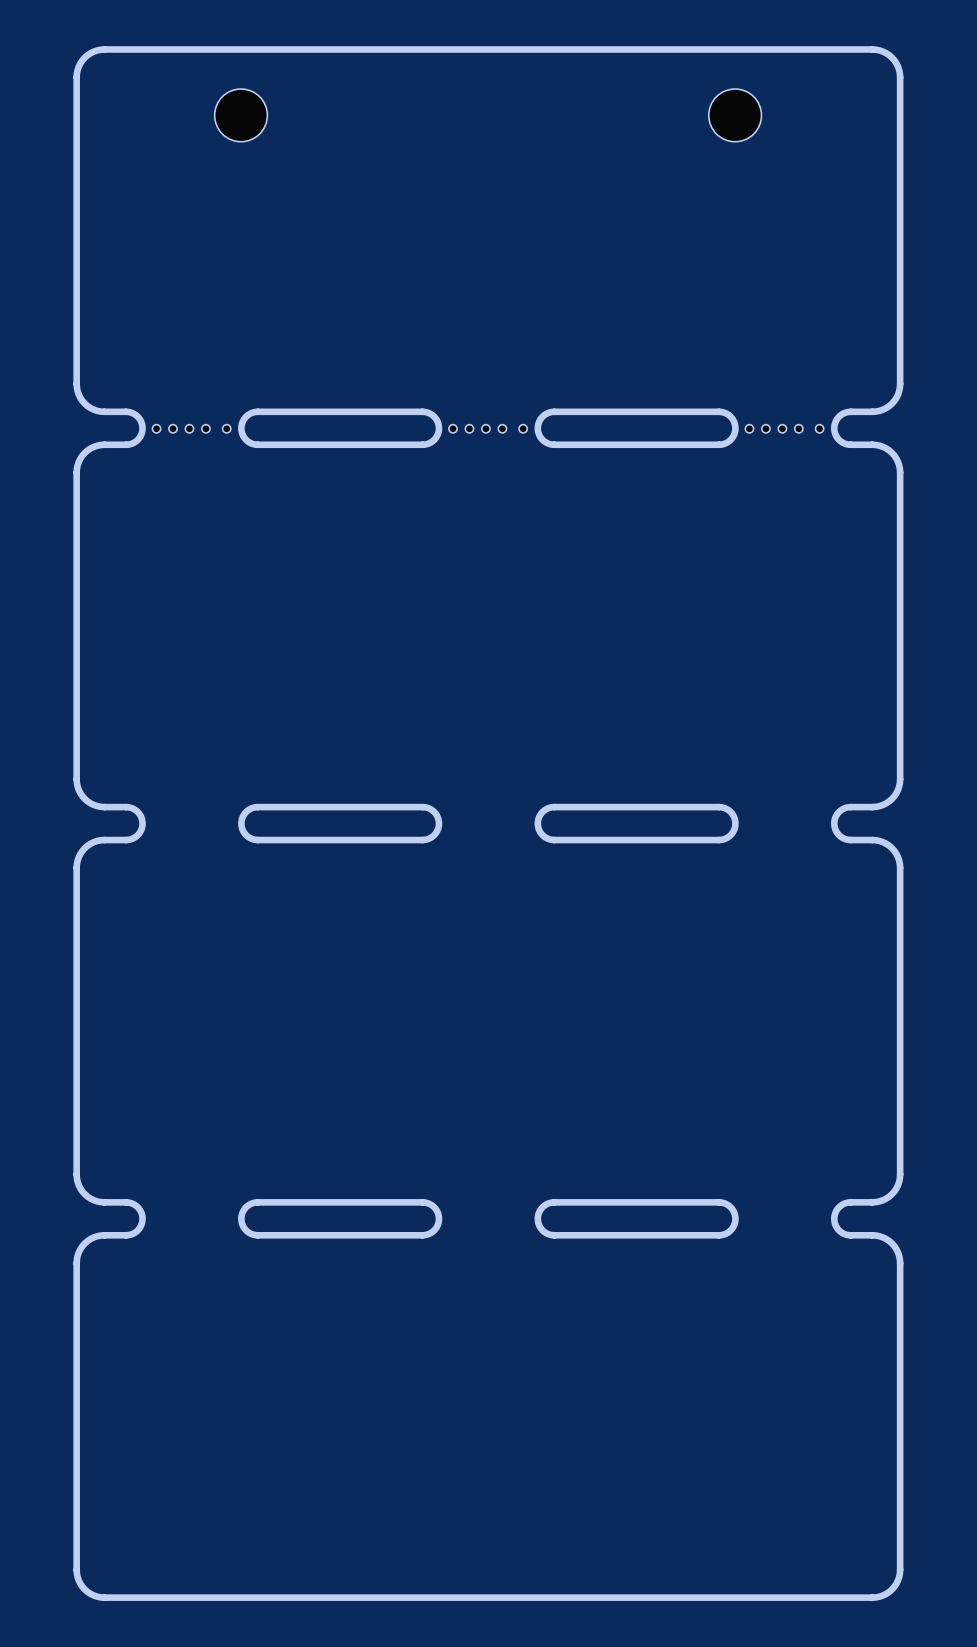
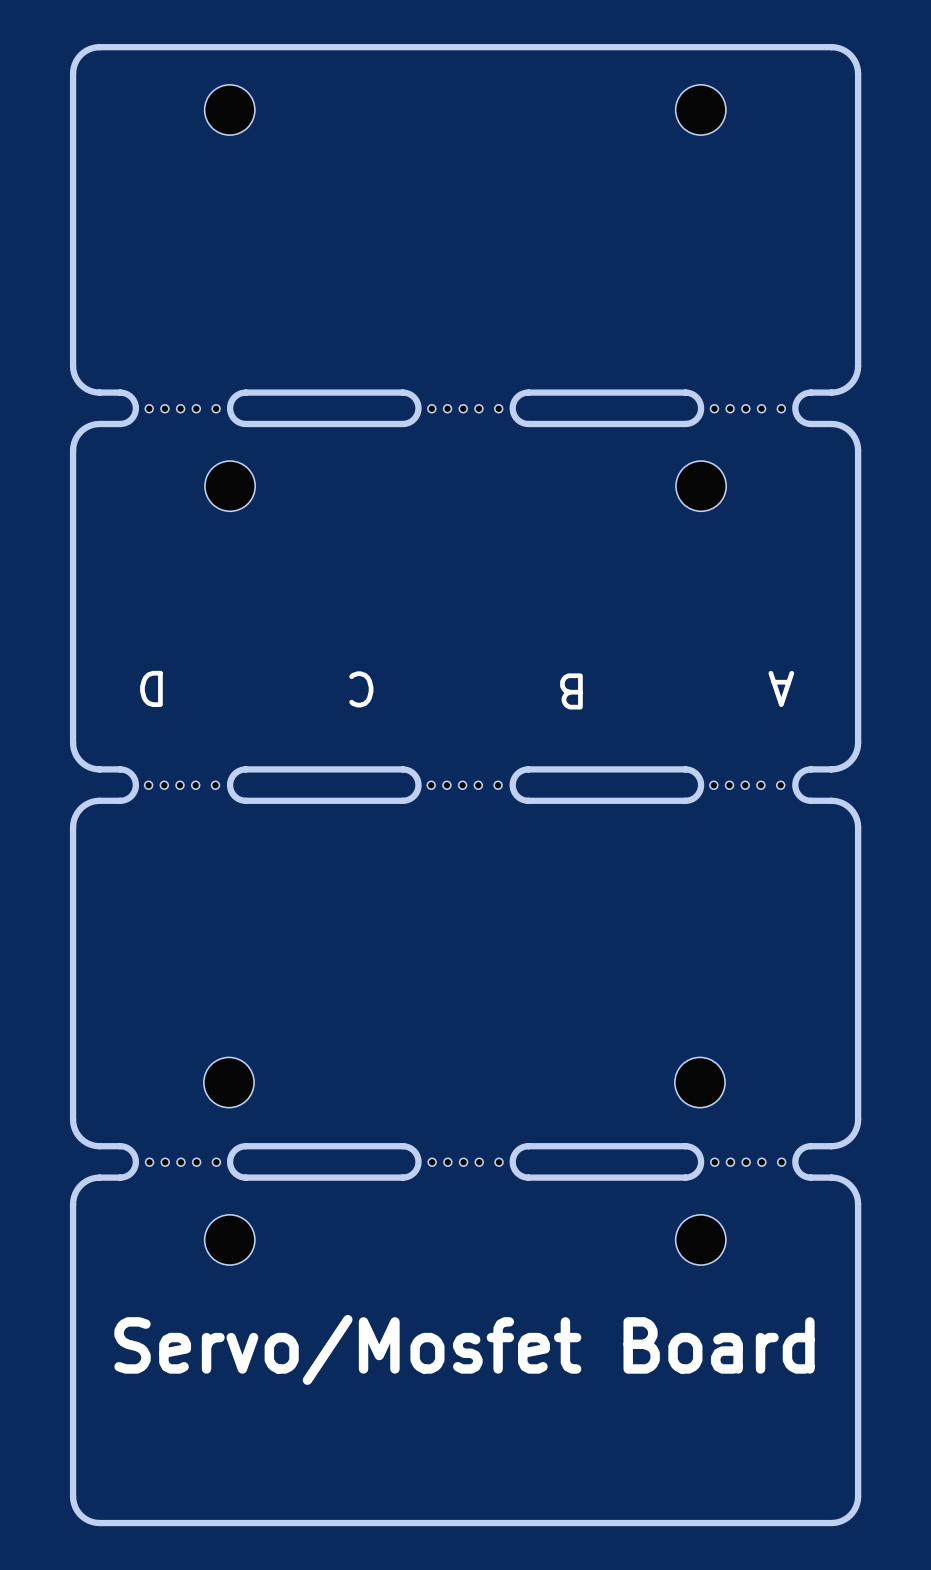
part: none -> (230, 486)
part: none -> (701, 486)
text: none -> D (151, 688)
text: none -> A (781, 688)
text: none -> C (361, 689)
text: none -> B (571, 691)
part: none -> (148, 785)
part: none -> (164, 785)
part: none -> (180, 785)
part: none -> (195, 785)
part: none -> (215, 785)
part: none -> (431, 785)
part: none -> (446, 785)
part: none -> (462, 785)
part: none -> (478, 785)
part: none -> (498, 785)
part: none -> (713, 785)
part: none -> (729, 785)
part: none -> (745, 785)
part: none -> (760, 785)
part: none -> (780, 785)
part: none -> (228, 1082)
part: none -> (699, 1082)
part: none -> (149, 1162)
part: none -> (165, 1162)
part: none -> (180, 1162)
part: none -> (196, 1162)
part: none -> (216, 1162)
part: none -> (432, 1162)
part: none -> (447, 1162)
part: none -> (463, 1162)
part: none -> (479, 1162)
part: none -> (499, 1162)
part: none -> (714, 1162)
part: none -> (730, 1162)
part: none -> (746, 1162)
part: none -> (761, 1162)
part: none -> (781, 1162)
part: none -> (229, 1239)
part: none -> (700, 1239)
text: none -> Servo/Mosfet Board (464, 1349)

